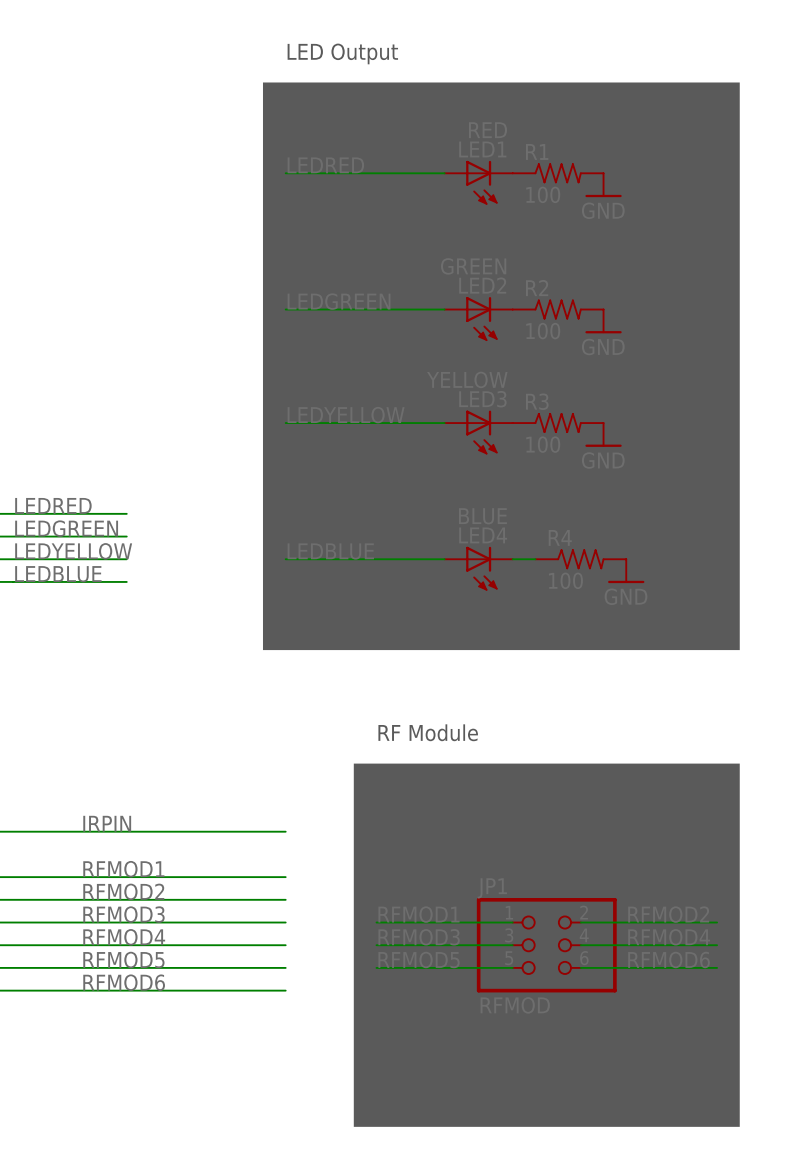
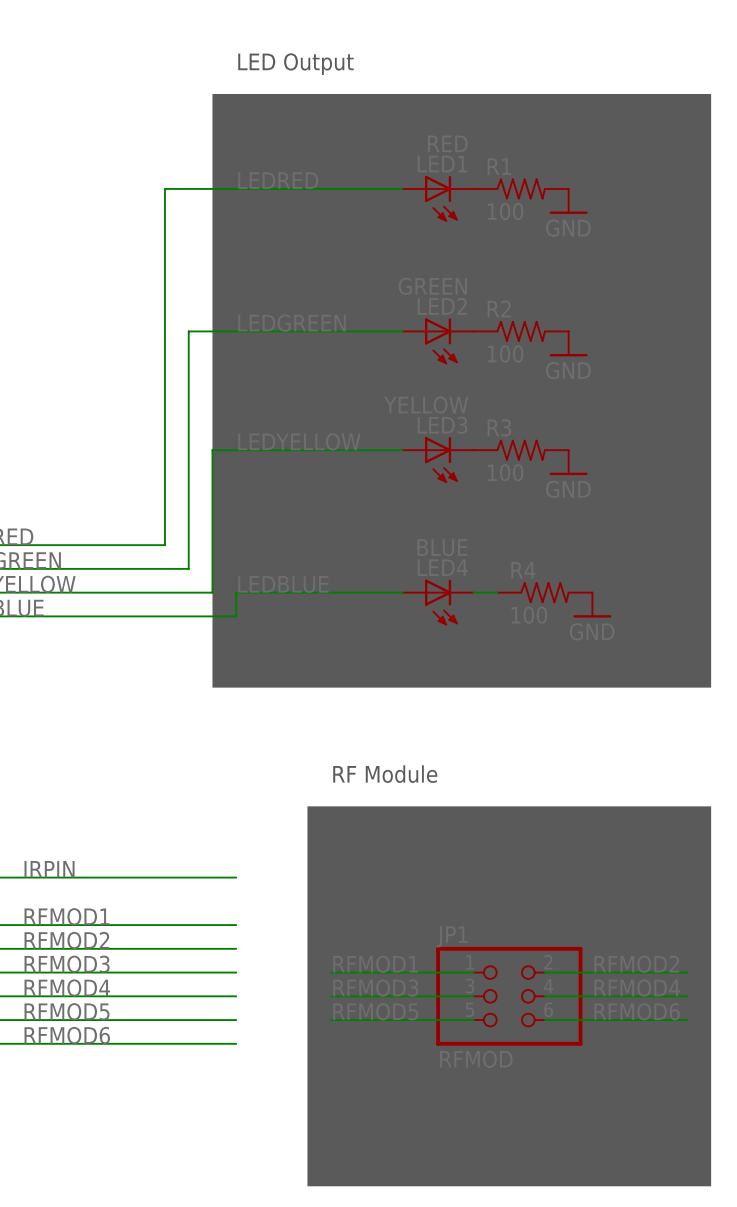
wire: none -> (236, 188) (164, 188) (164, 545) (69, 545)
wire: none -> (236, 331) (188, 331) (188, 568) (69, 568)
wire: none -> (236, 450) (212, 450) (212, 592) (69, 592)
wire: none -> (236, 592) (236, 616) (69, 616)

